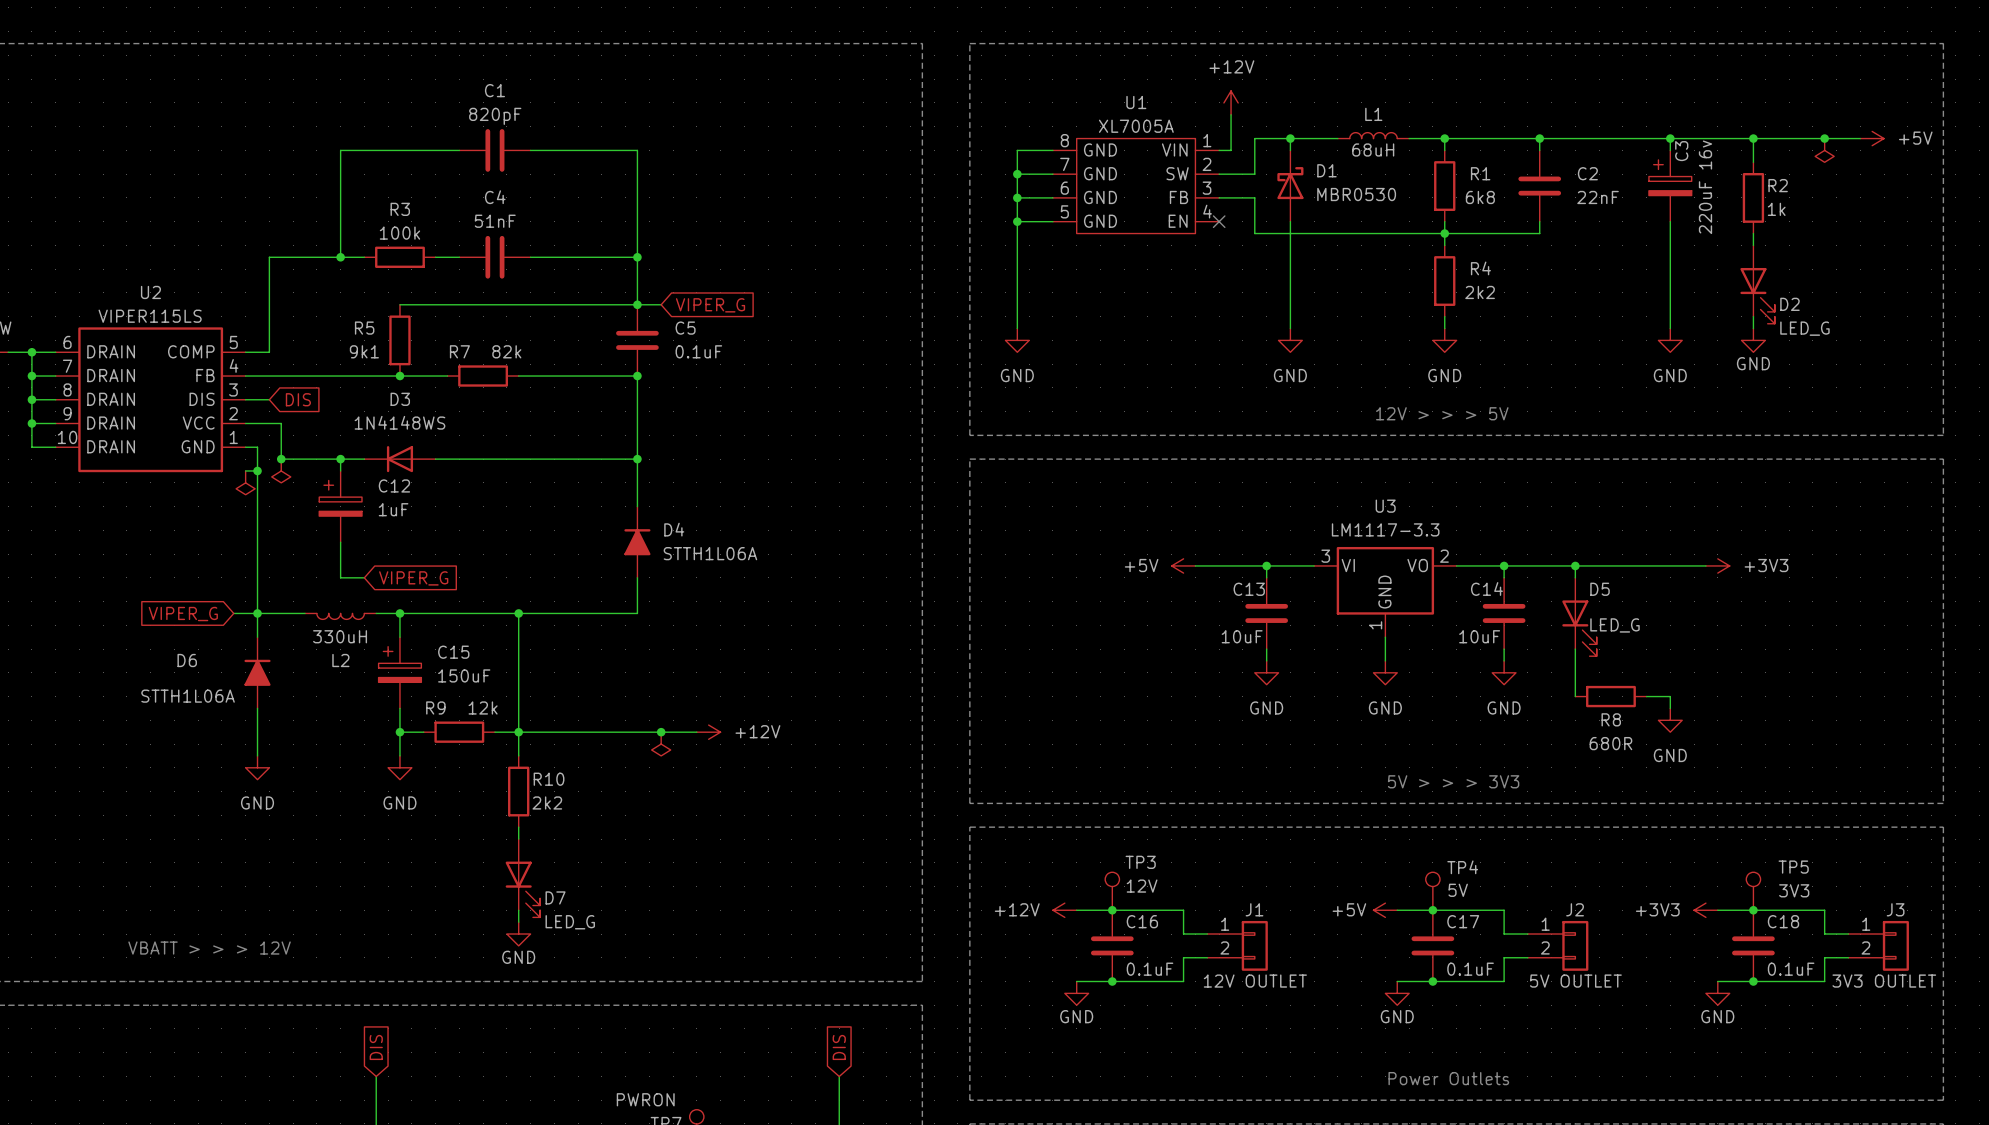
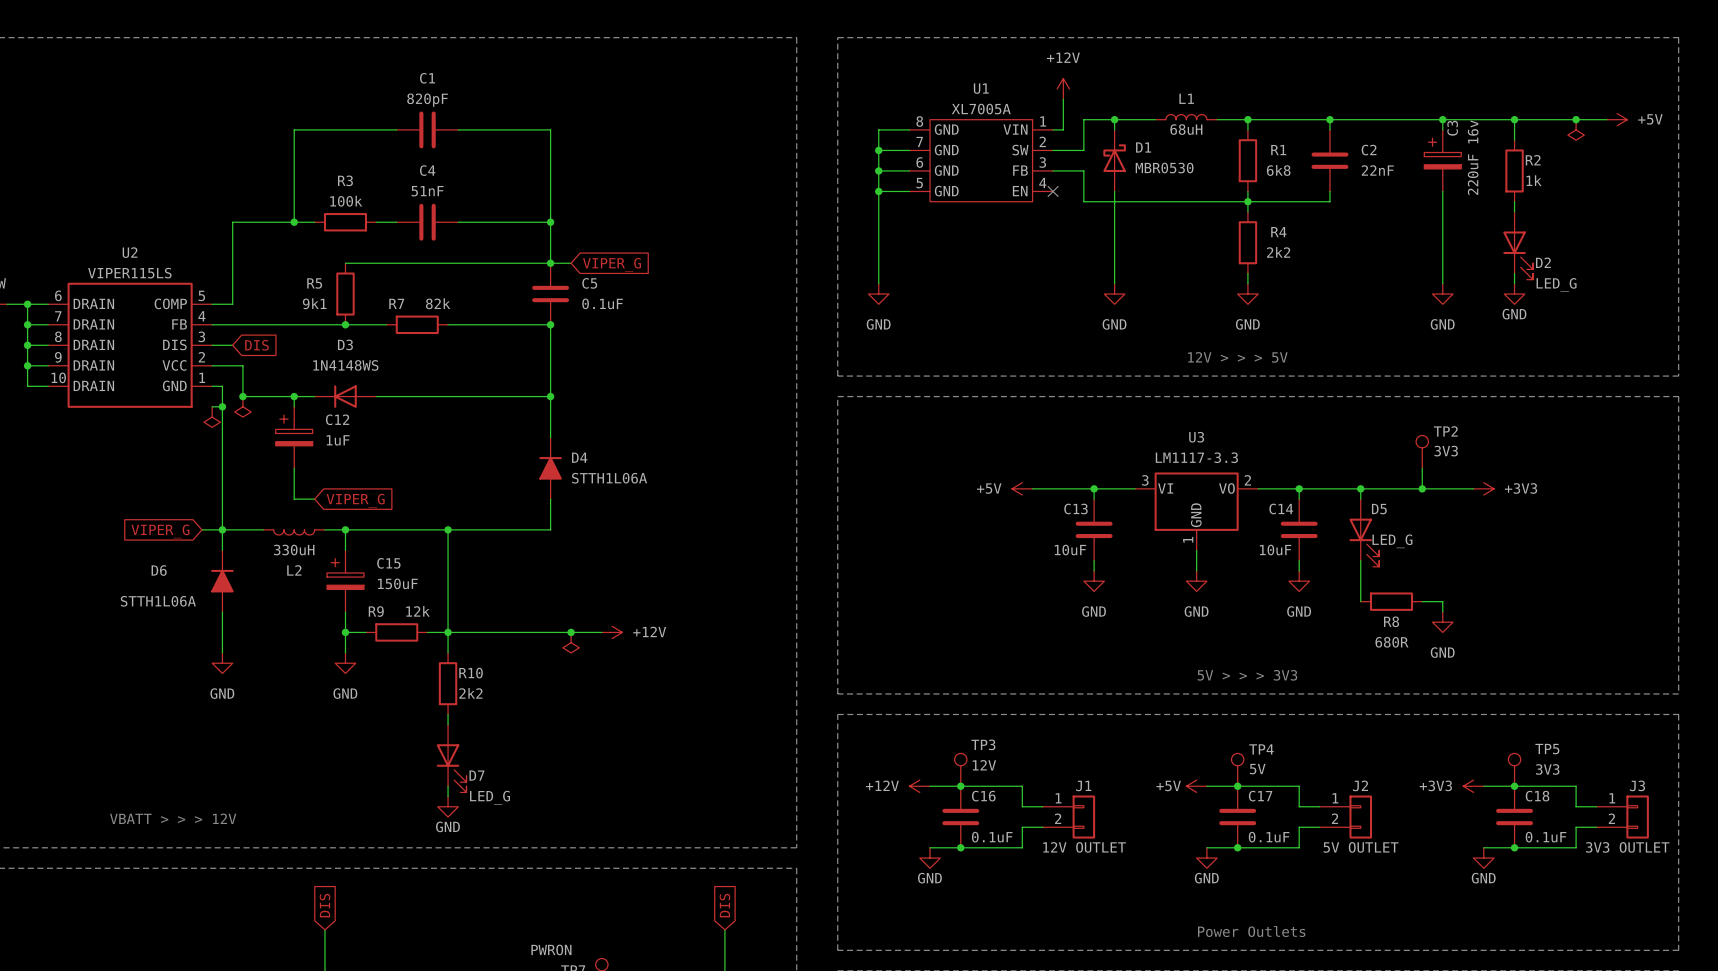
TP2: none -> 3V3 (1422, 451)
wire: none -> (1422, 468) (1422, 488)
junction: none -> (1422, 488)

